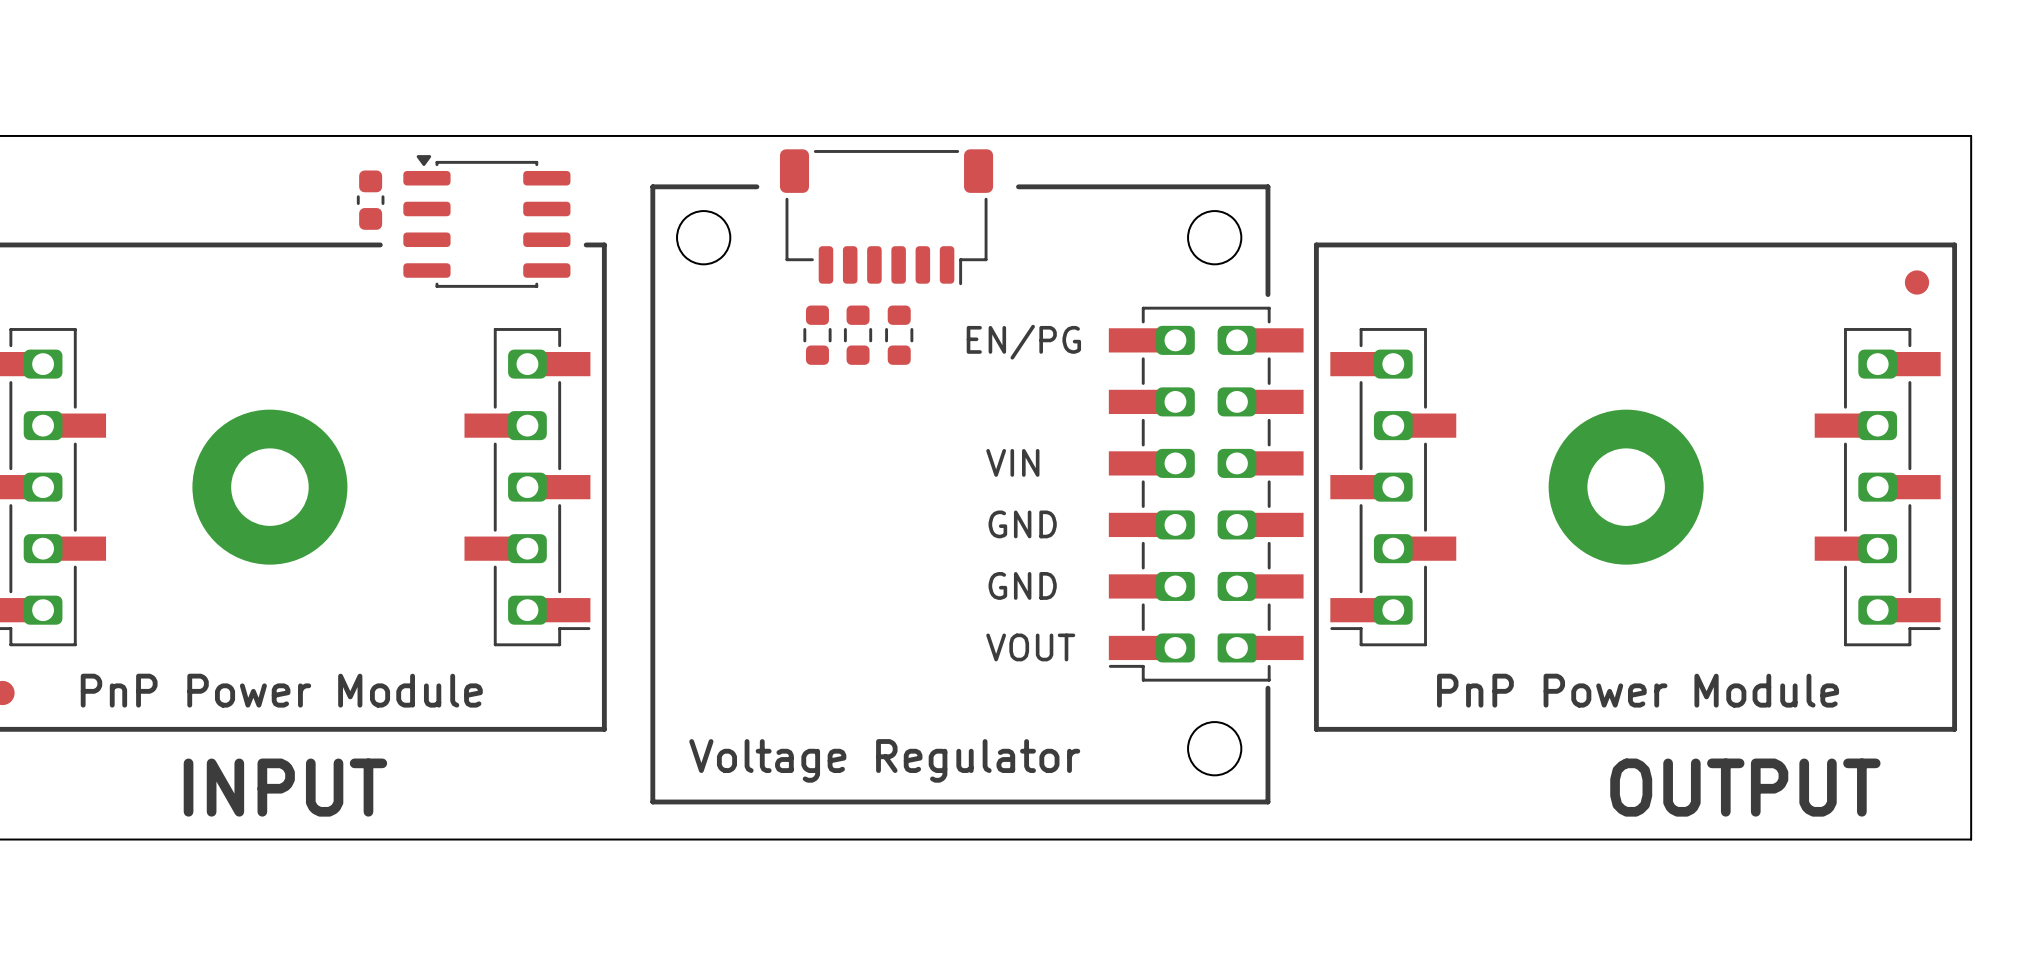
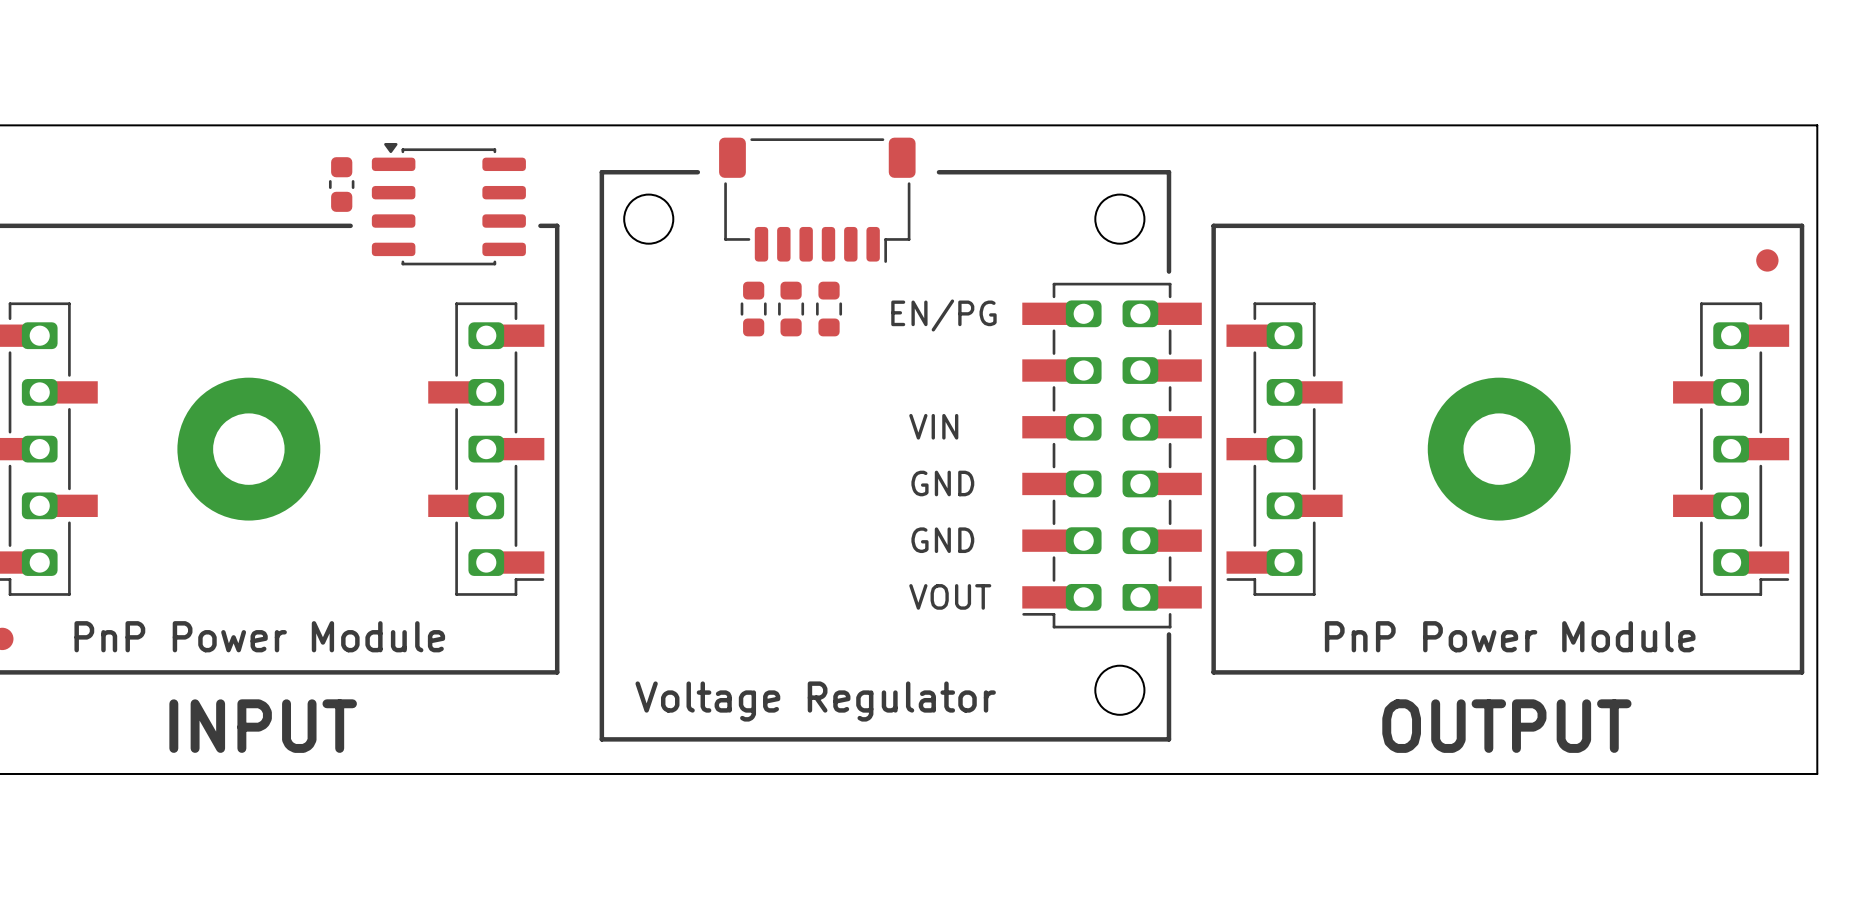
text position: OUTPUT (1745, 787) -> OUTPUT (1506, 726)

